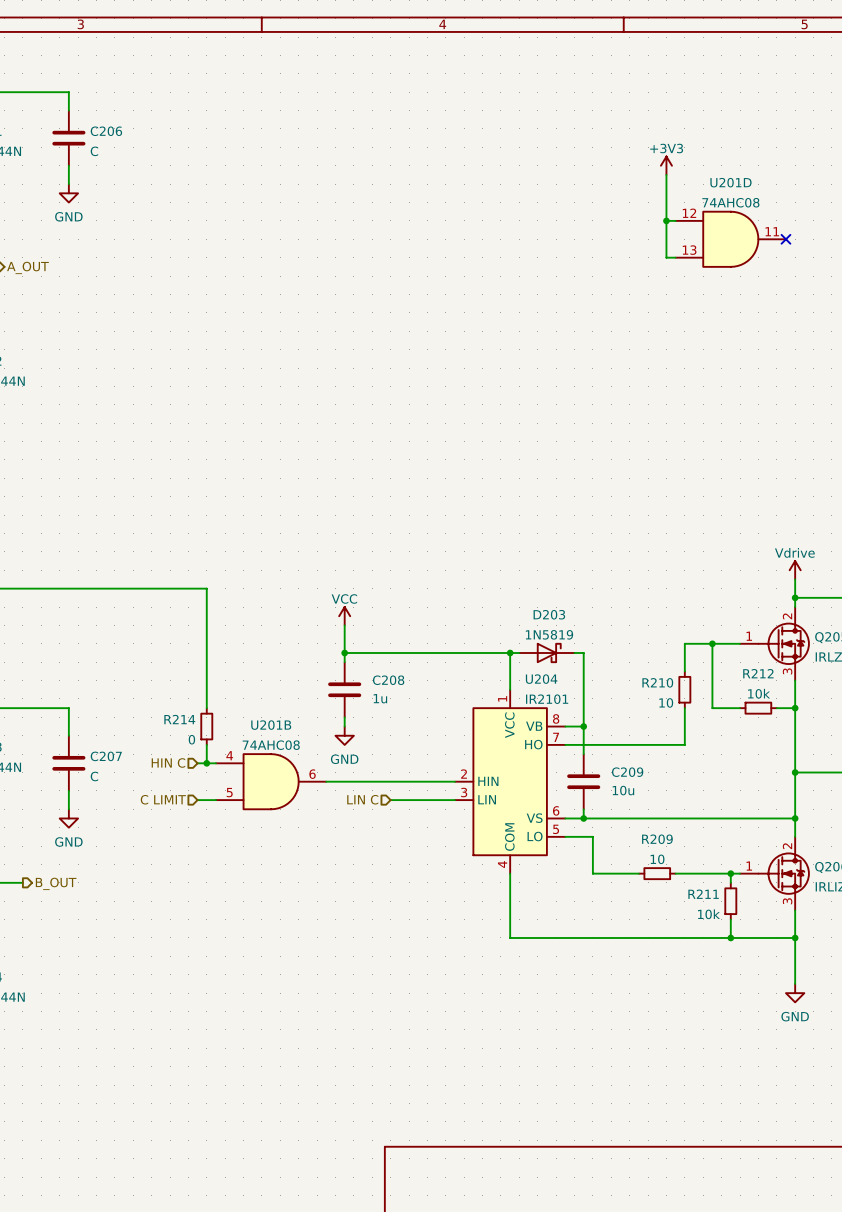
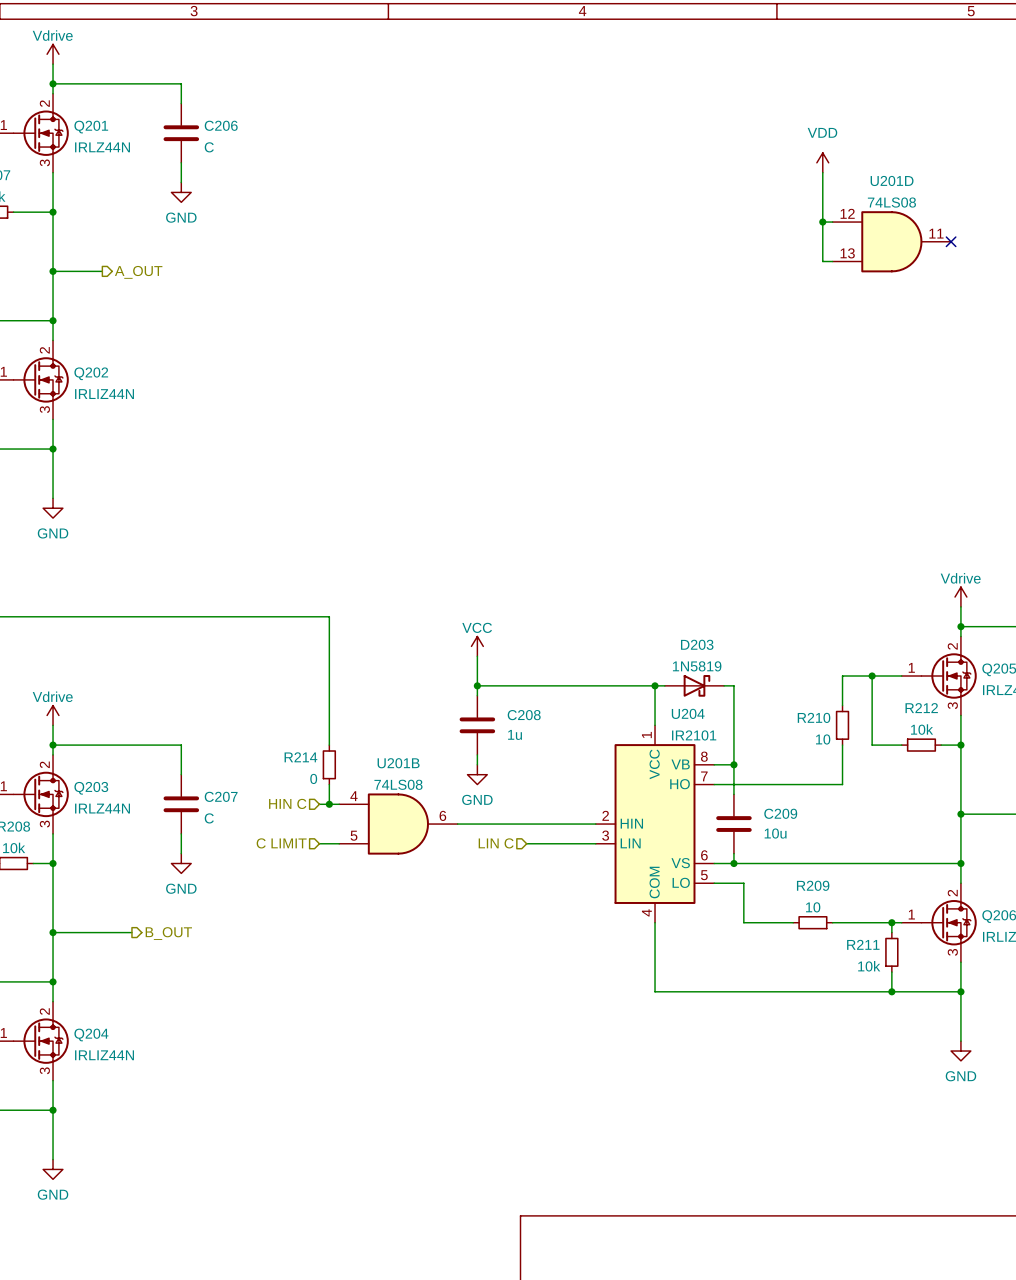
power symbol: +3V3 (666, 165) -> VDD (822, 162)
U201D value: 74AHC08 (730, 202) -> 74LS08 (891, 202)
U201B value: 74AHC08 (271, 745) -> 74LS08 (398, 784)

